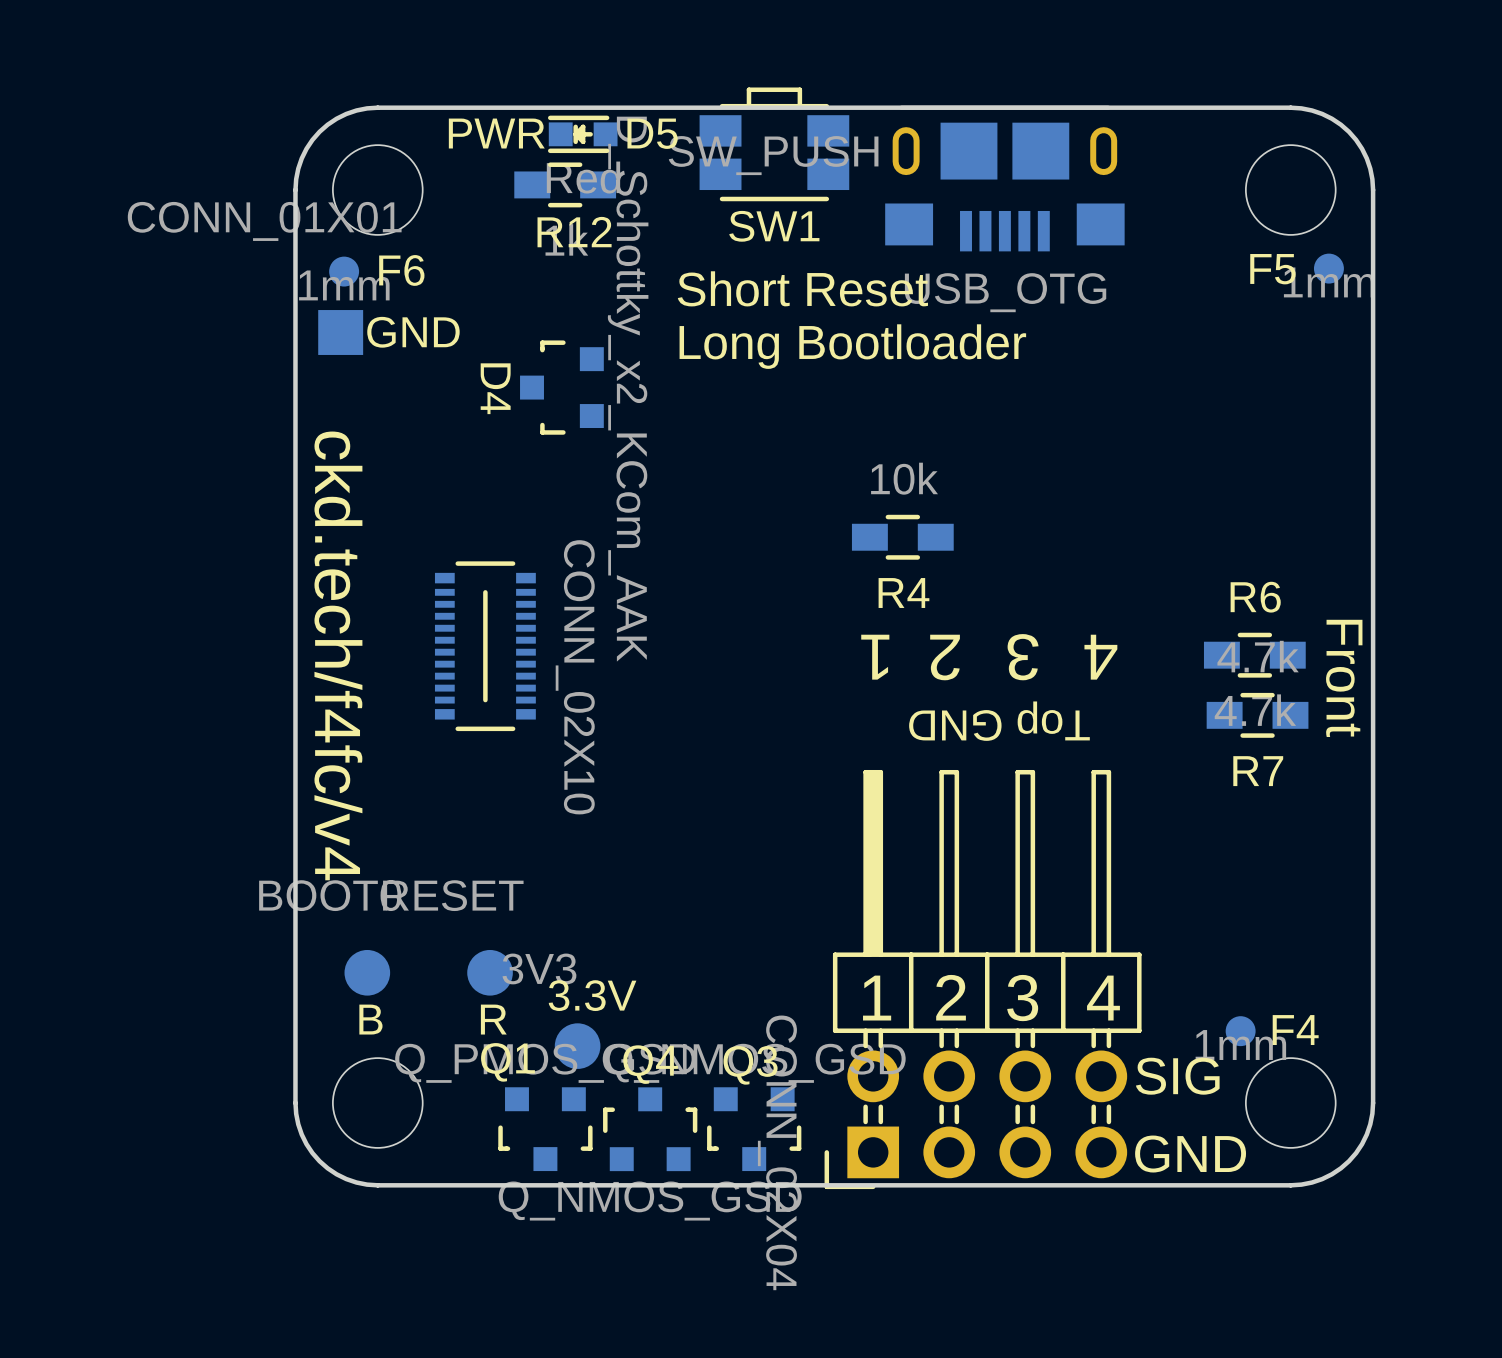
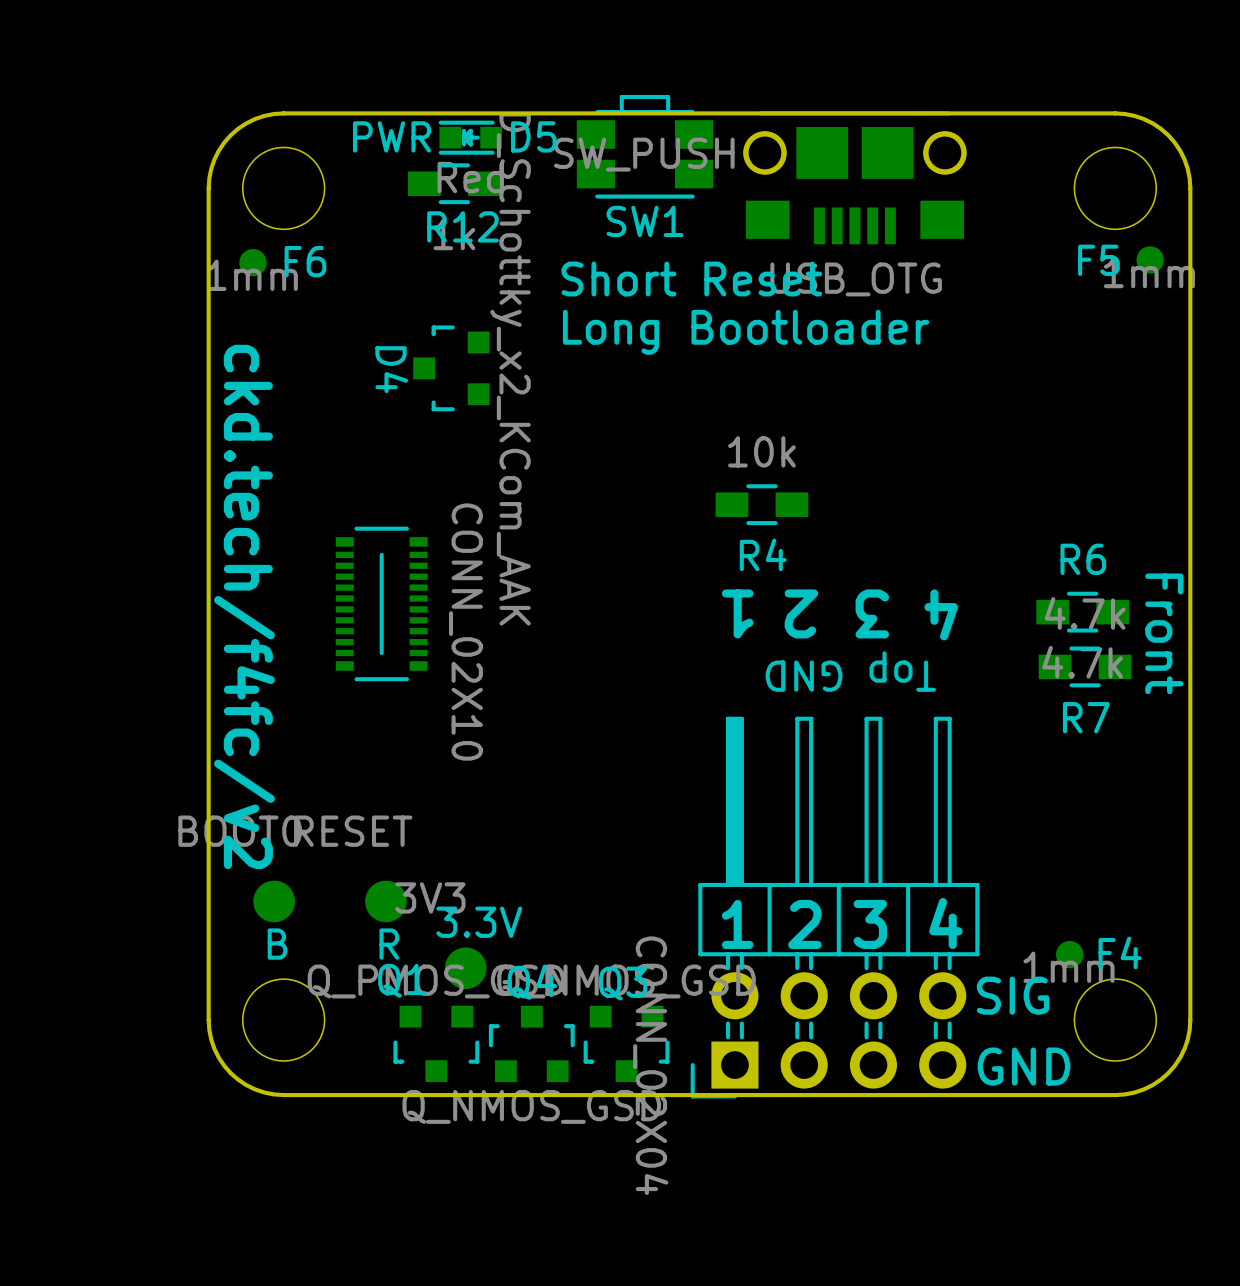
part footprint: [885, 105, 1125, 252] -> [743, 111, 967, 245]
part: CONN_01X01 (340, 332) -> none
text: GND (413, 332) -> none
text: ckd.tech/f4fc/v4 (338, 655) -> ckd.tech/f4fc/v2 (244, 606)

